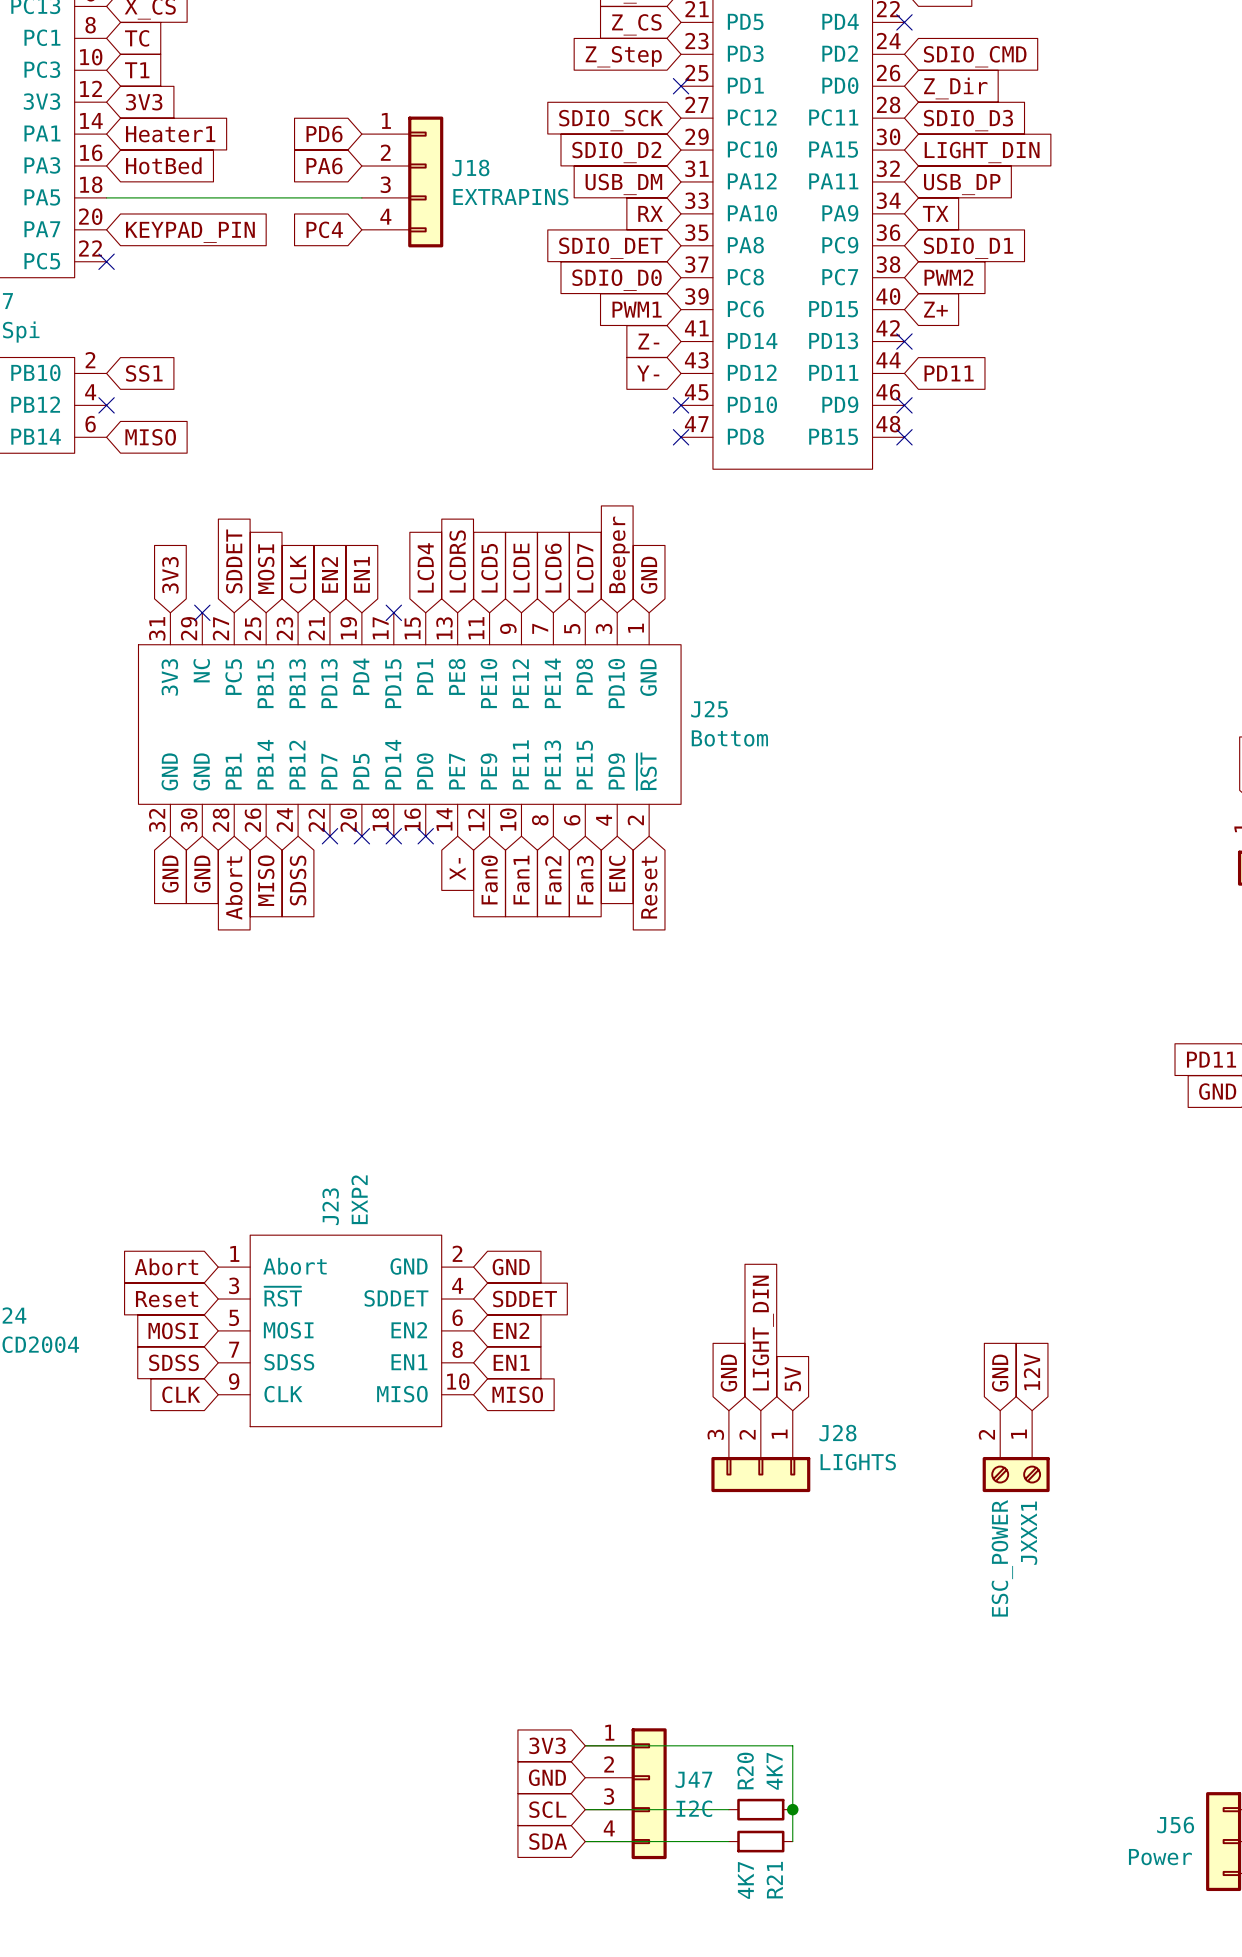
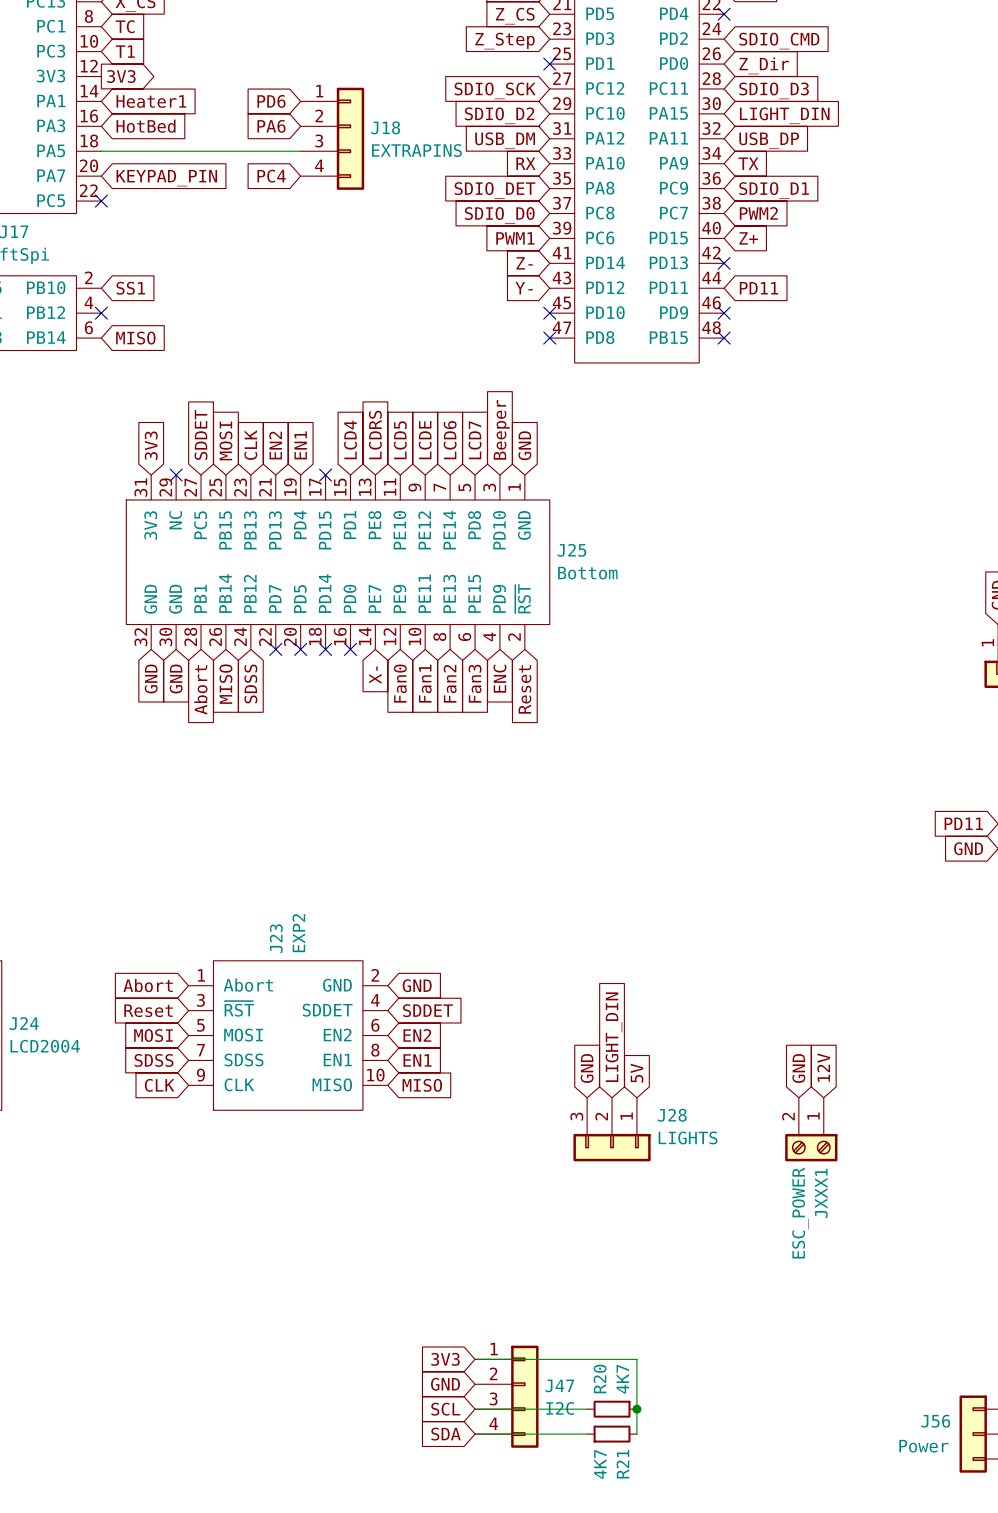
global label shape: input (144, 102) -> output (121, 76)

